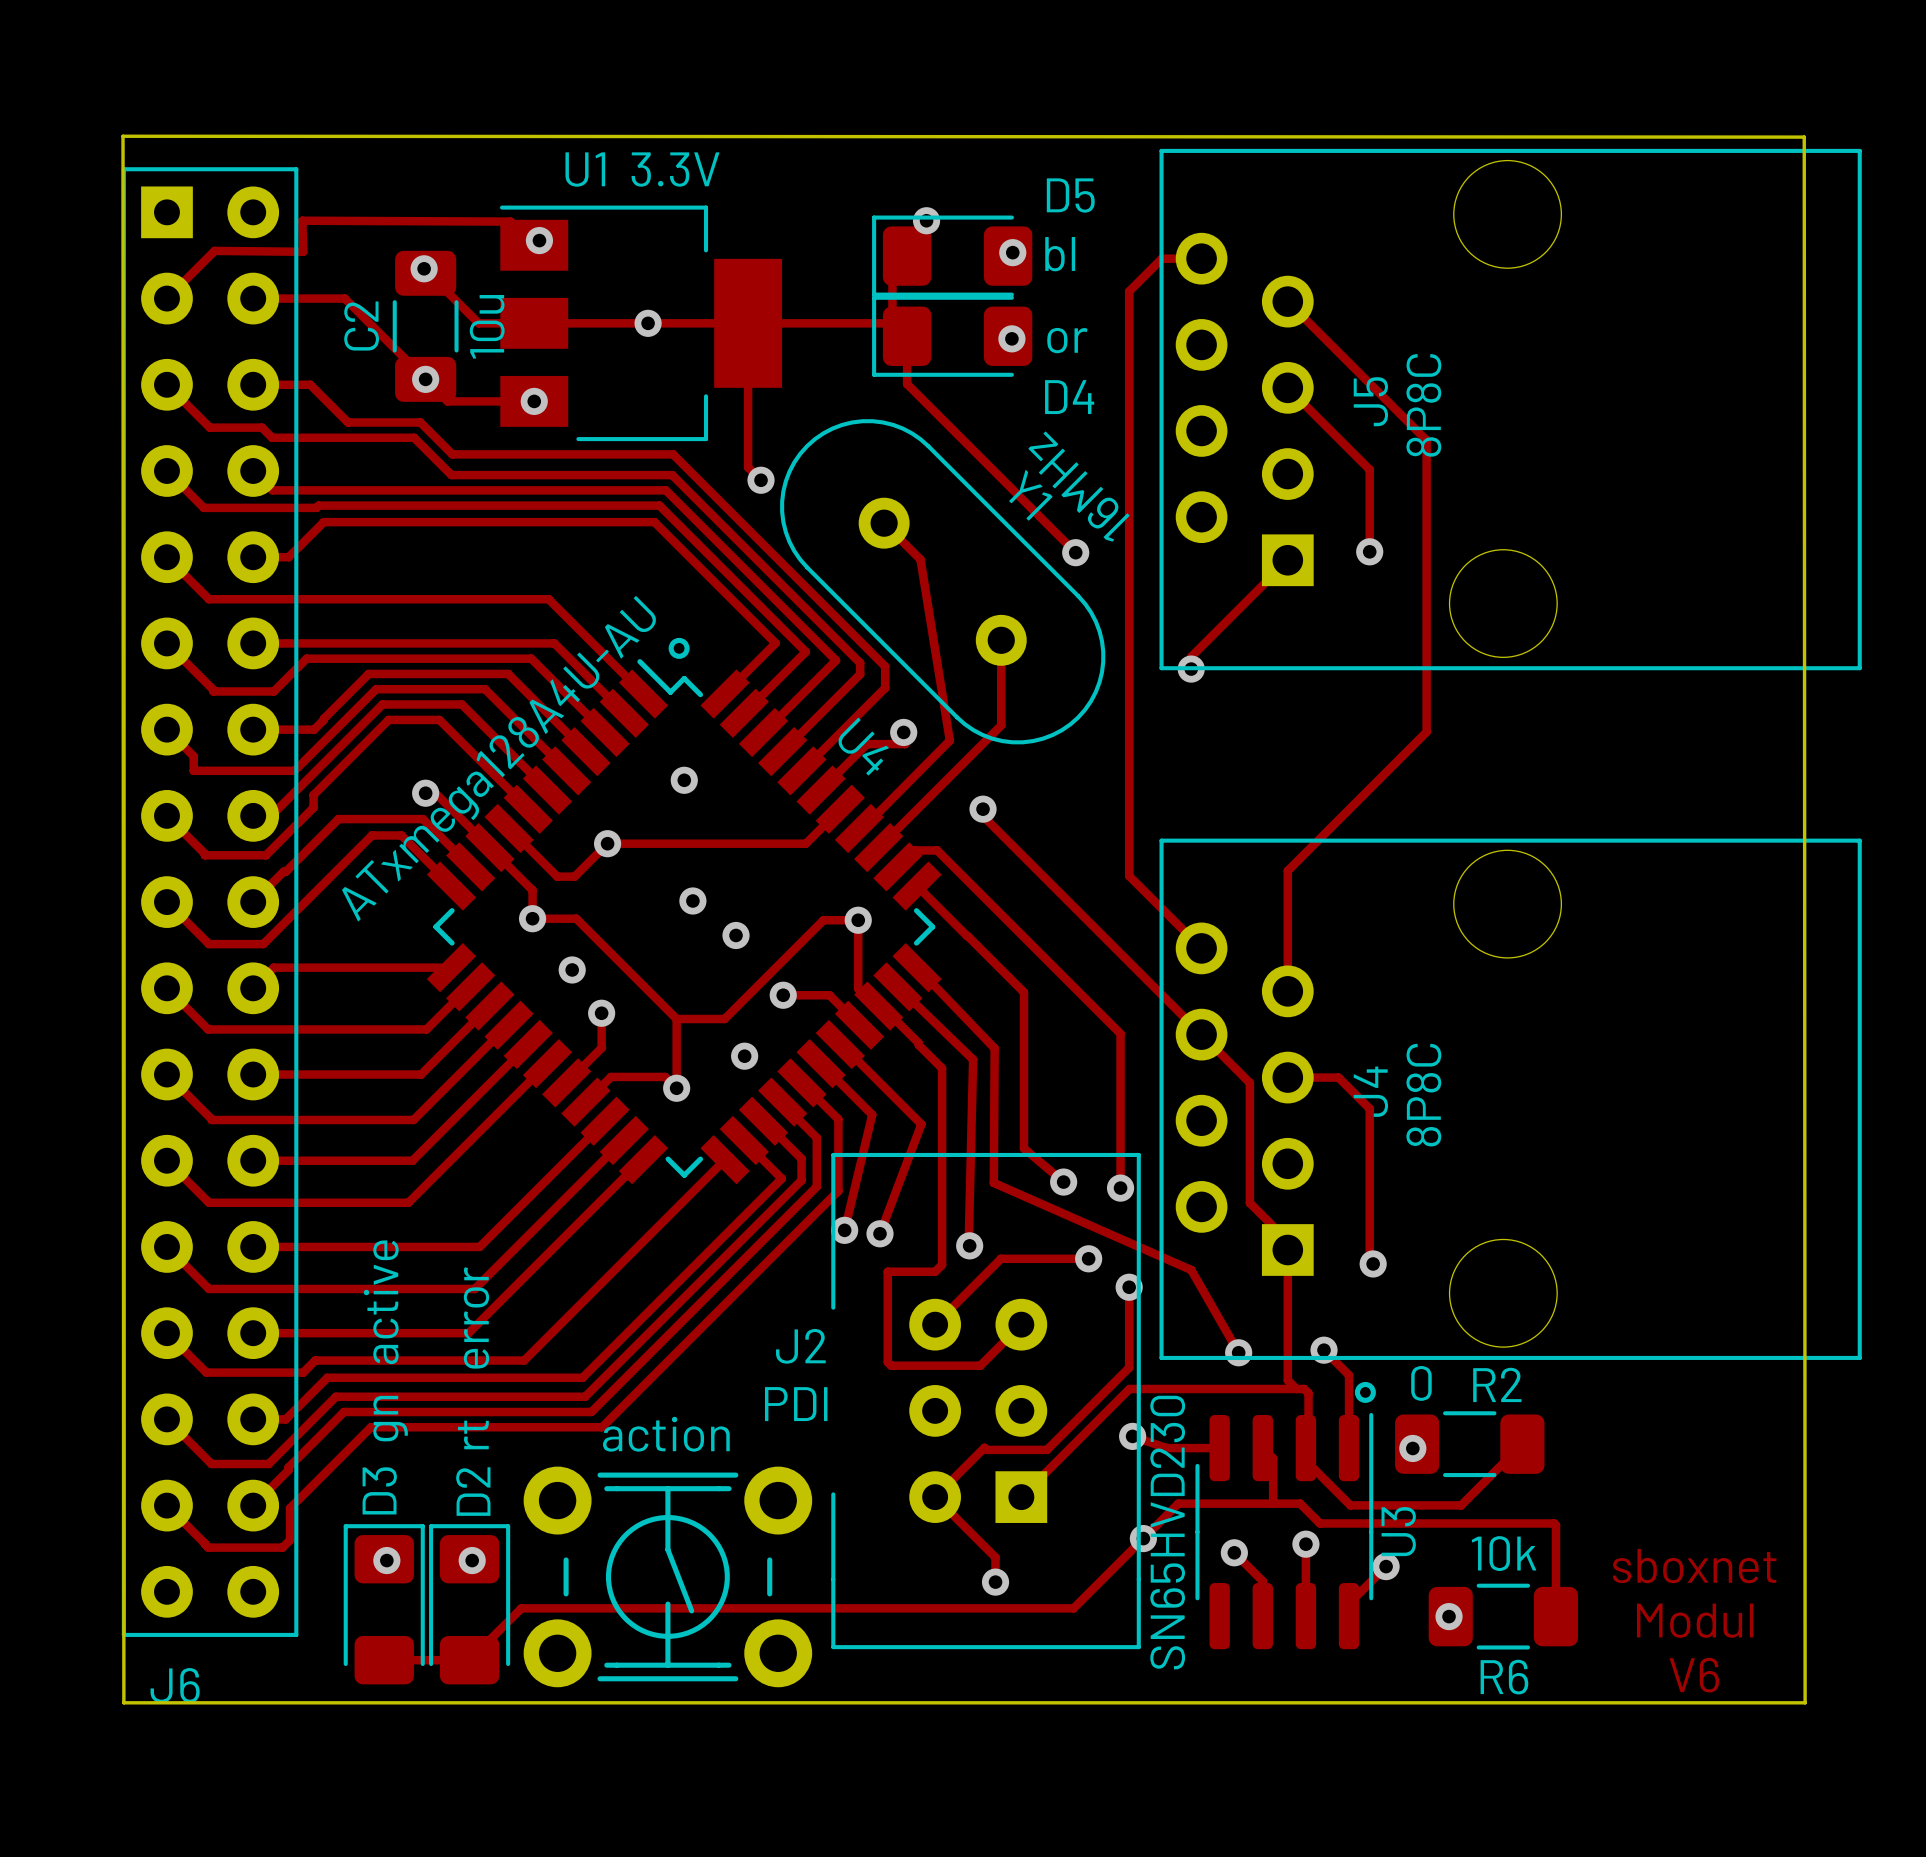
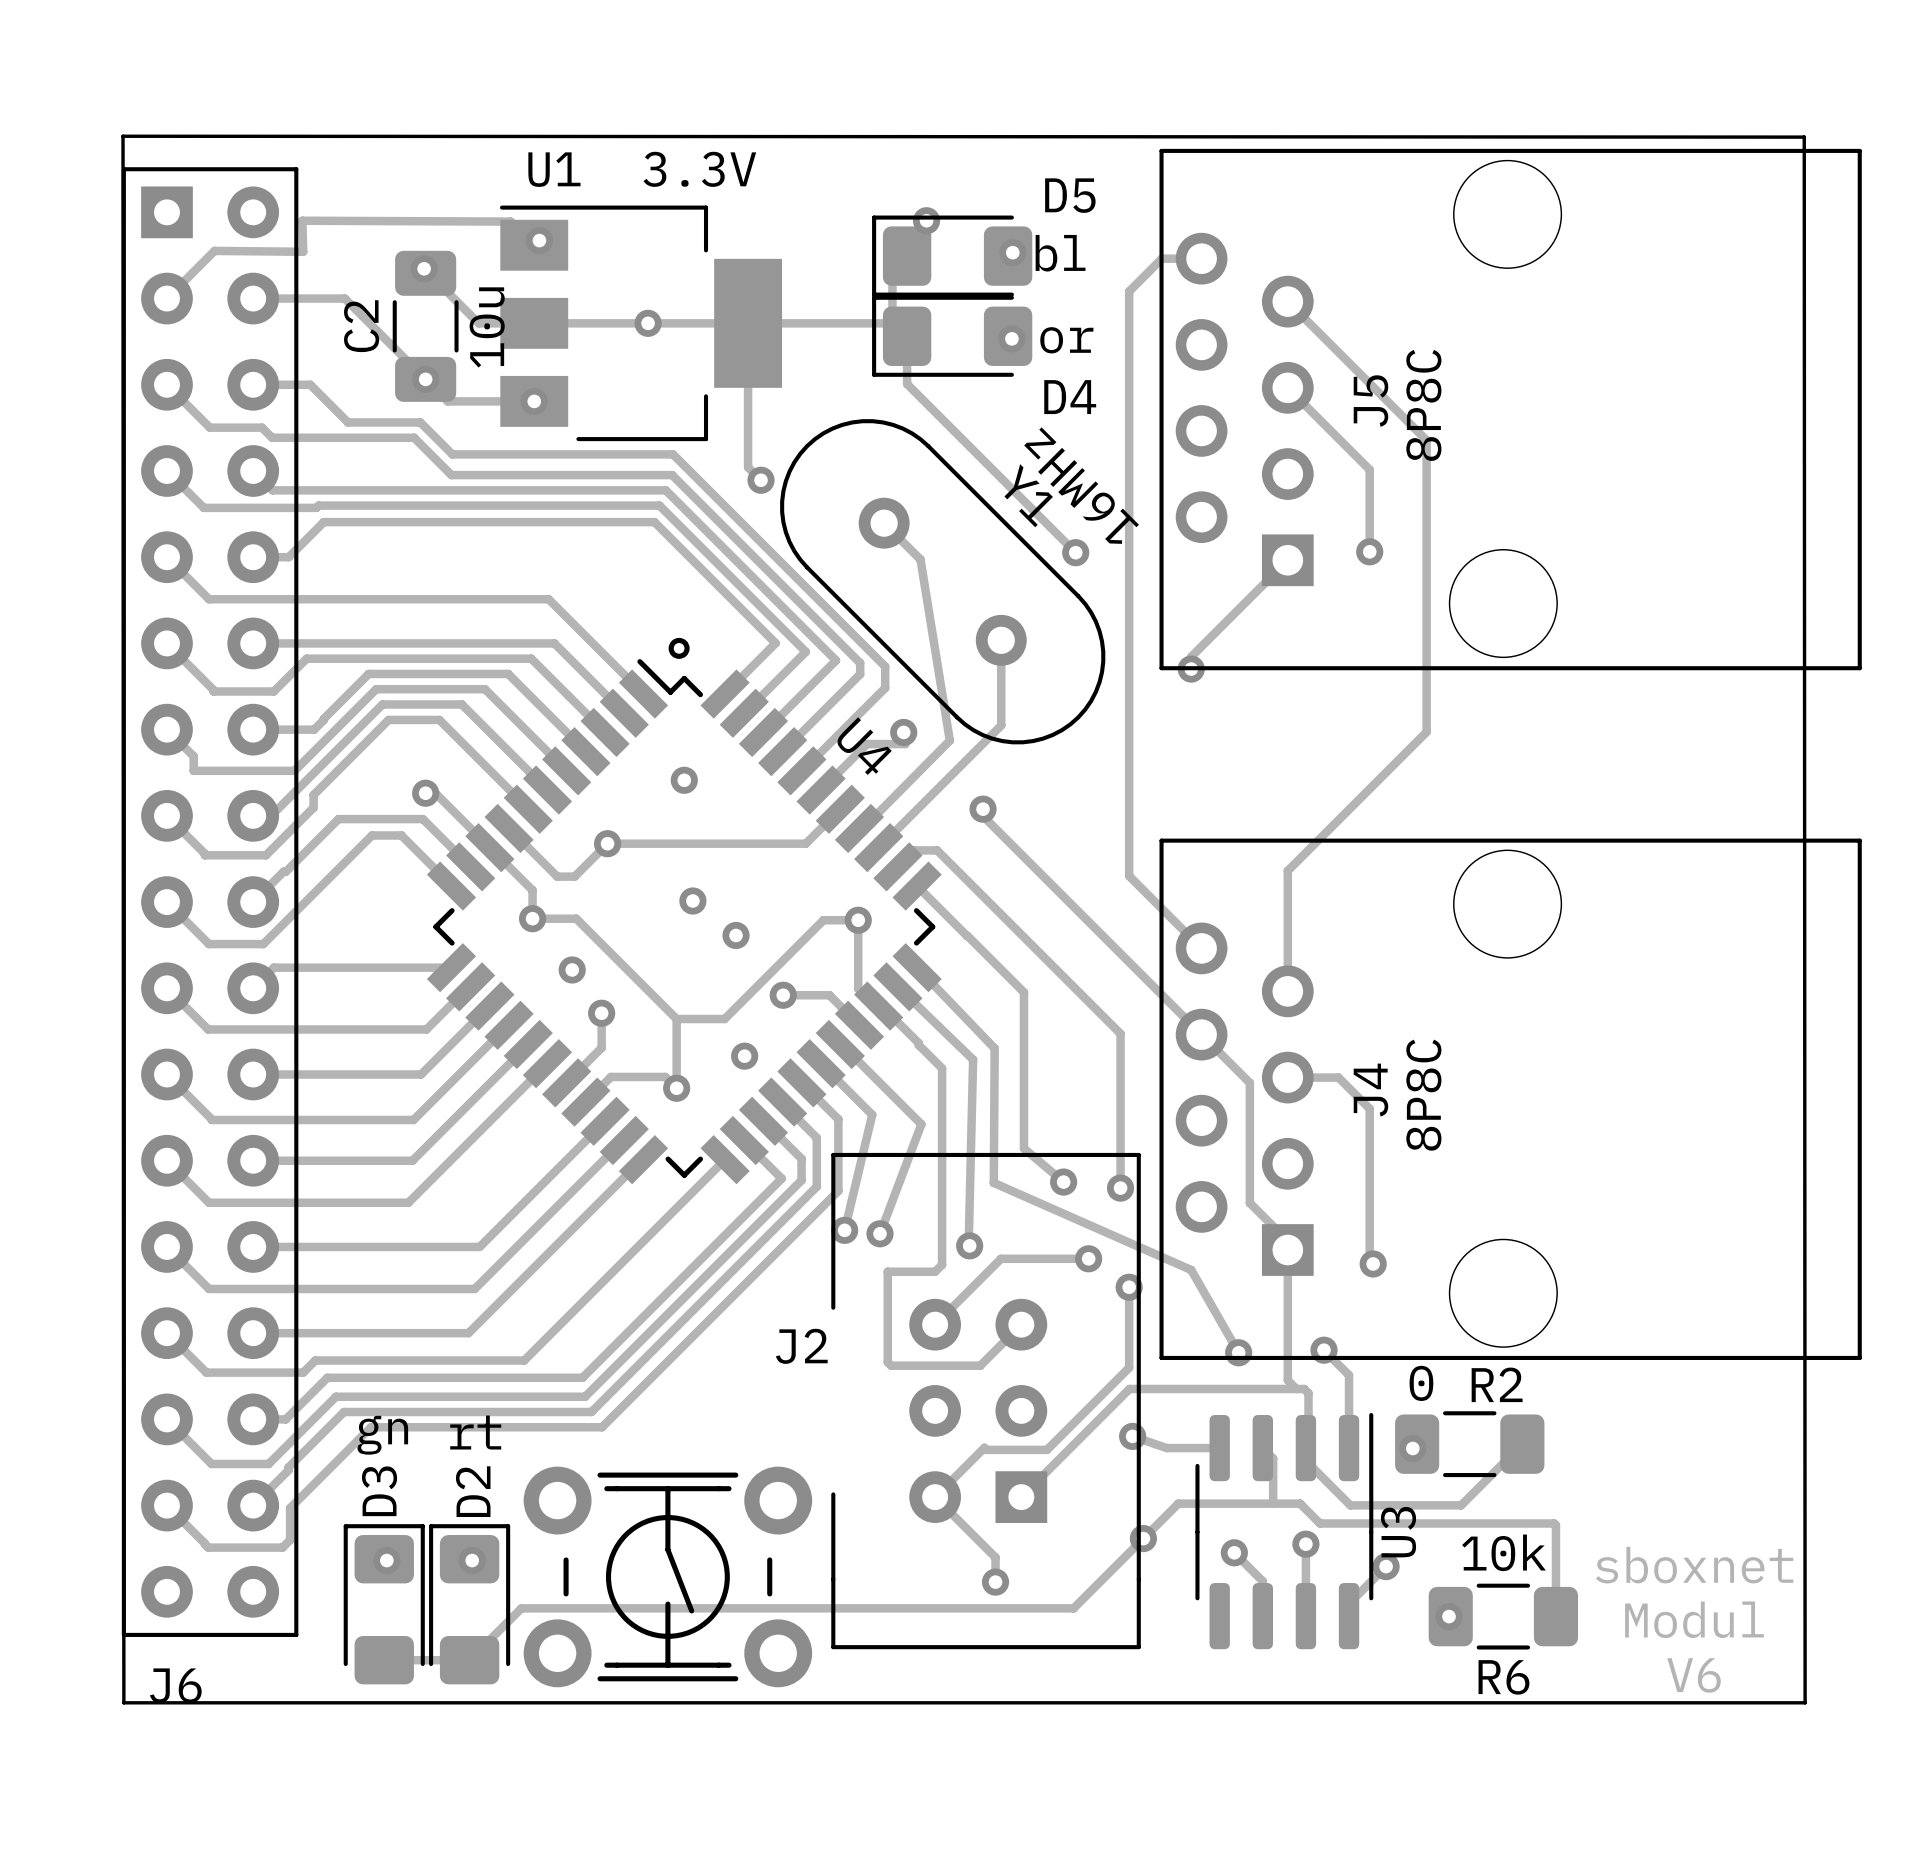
U4 value: ATxmega128A4U-AU (499, 758) -> none
text: active (381, 1302) -> none
text: error (476, 1317) -> none
drawing: [1354, 1381, 1376, 1403] -> none
text: PDI (796, 1404) -> none
text rotation: 0° (390, 1418) -> 90° clockwise (382, 1435)
text rotation: 0° (473, 1434) -> 90° clockwise (475, 1432)
text: action (666, 1434) -> none
U3 value: SN65HVD230 (1167, 1532) -> none

